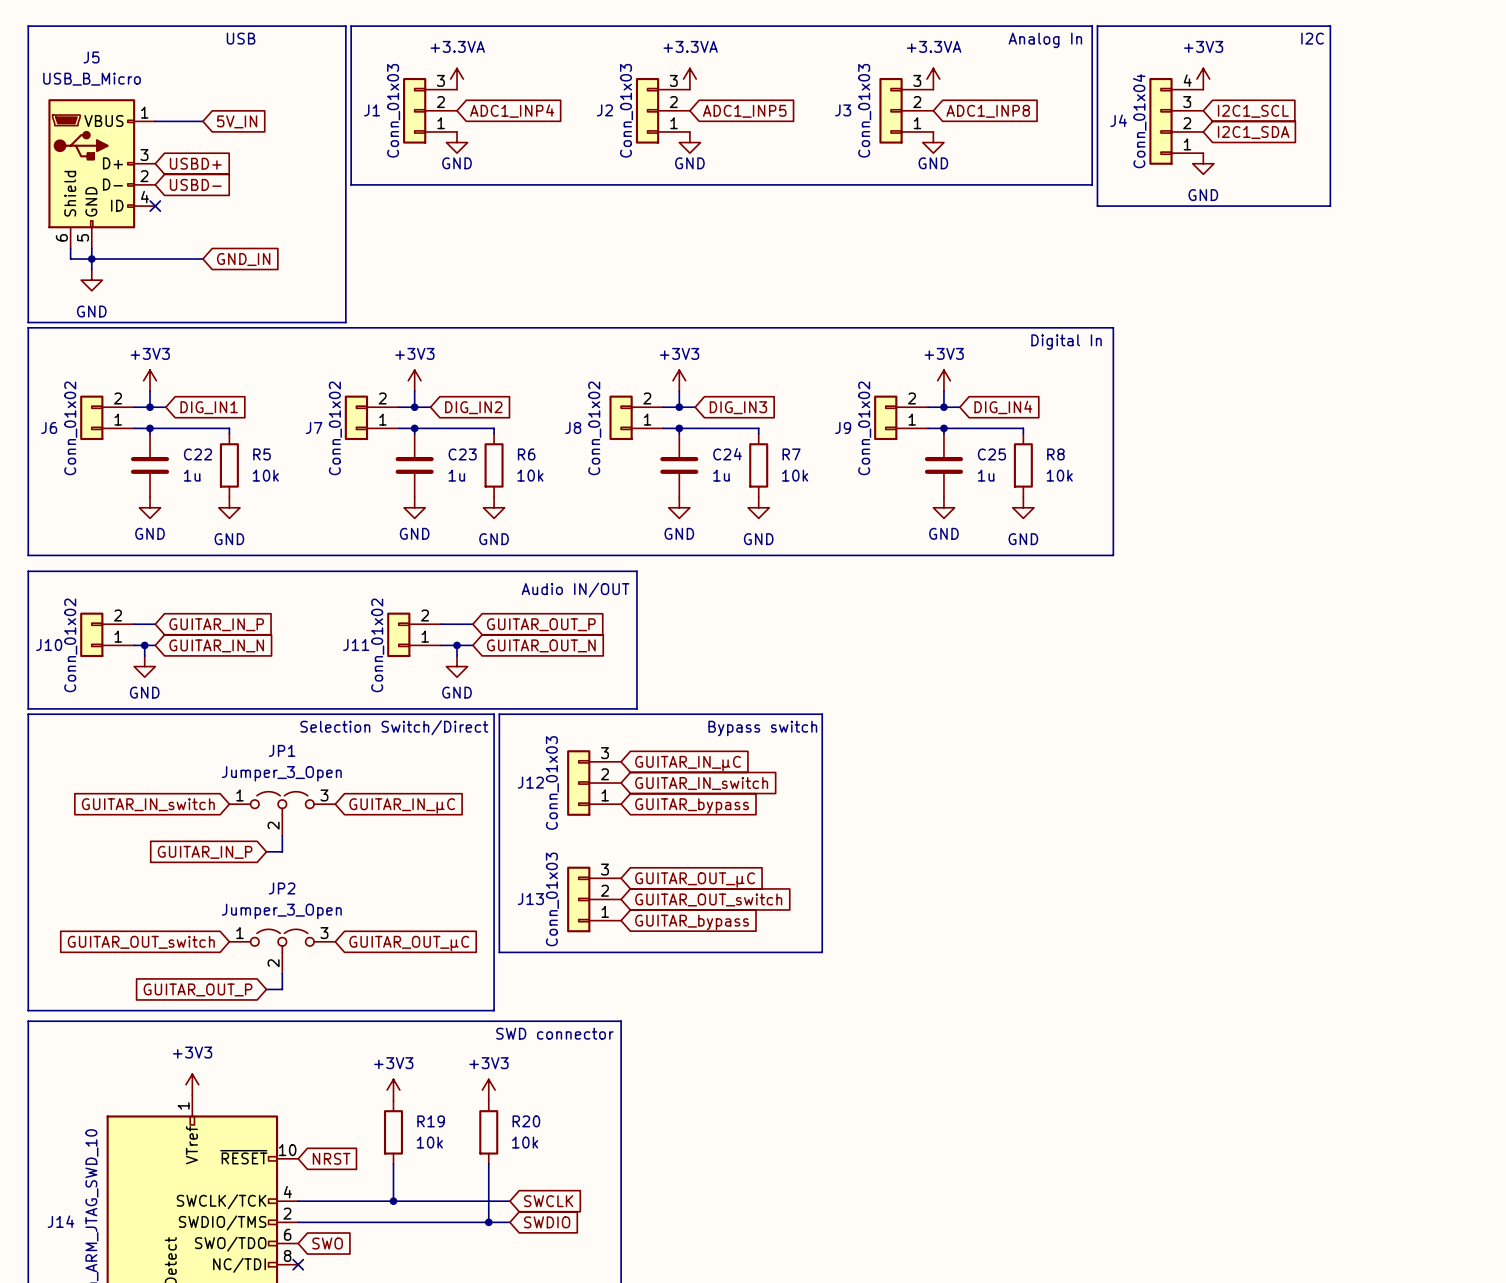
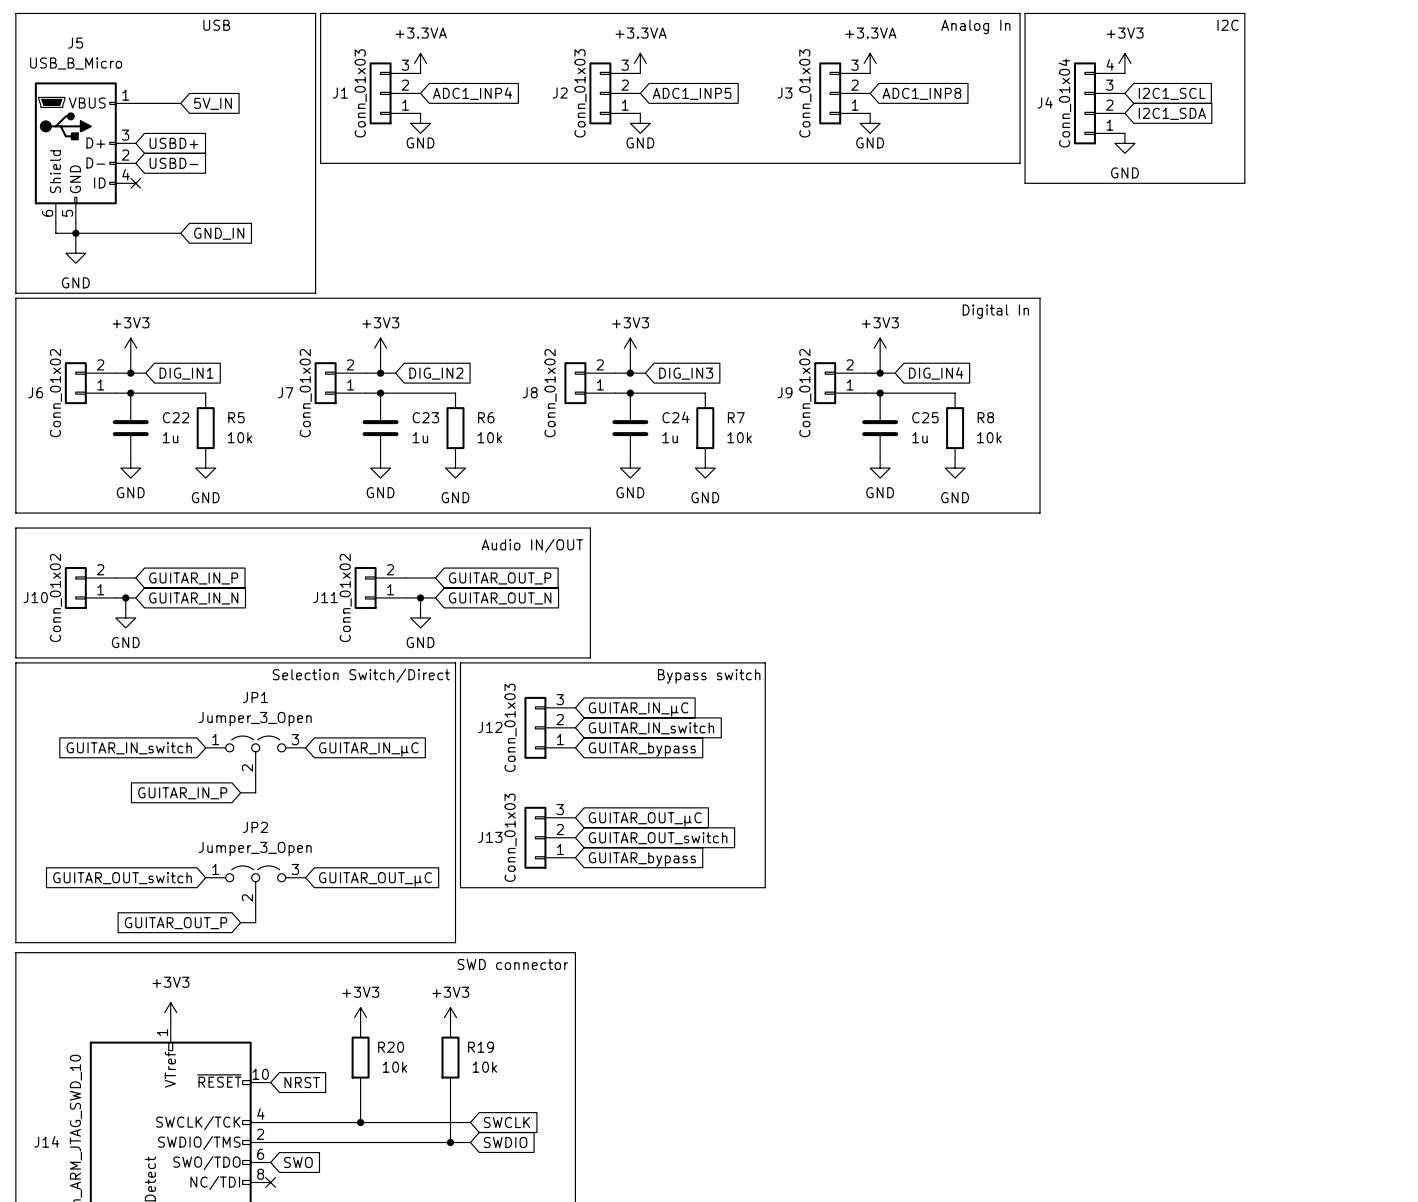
R19 name: R19 (431, 1121) -> R20 (391, 1047)
R20 name: R20 (526, 1121) -> R19 (481, 1047)

